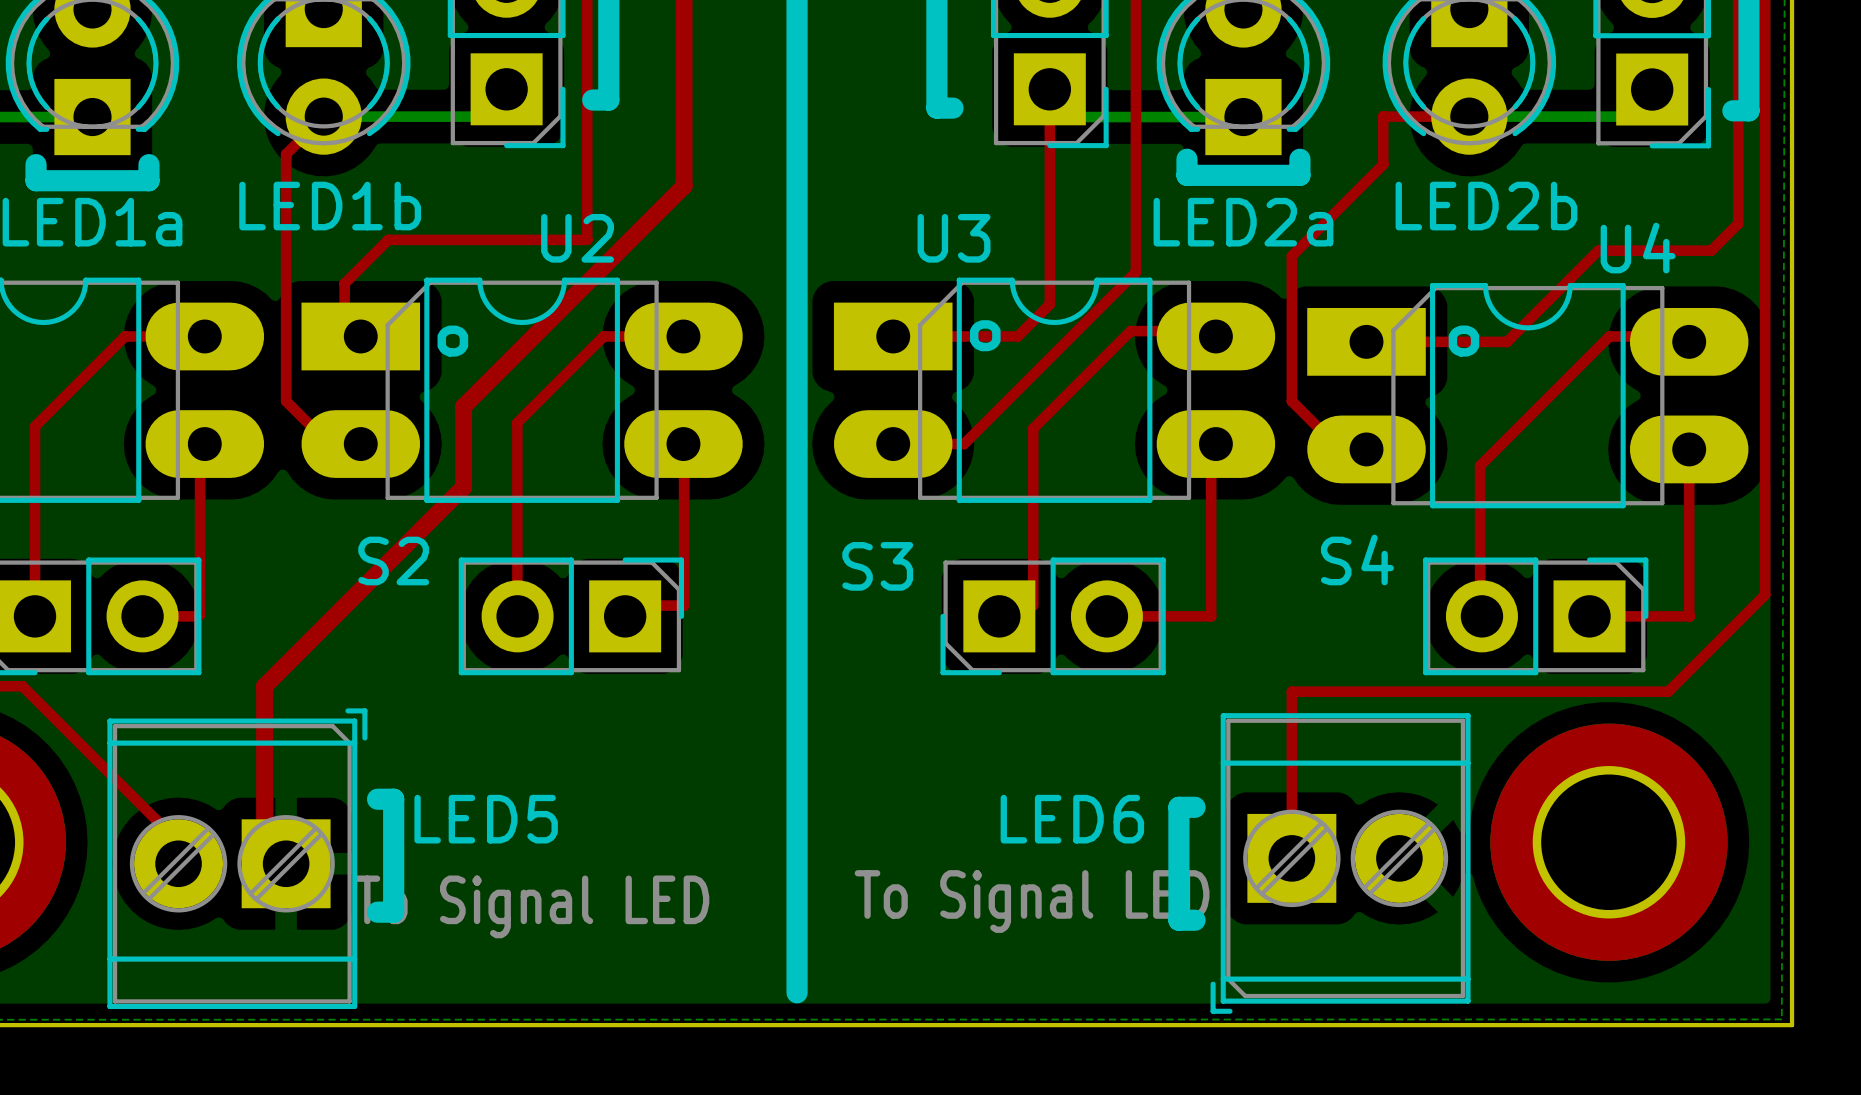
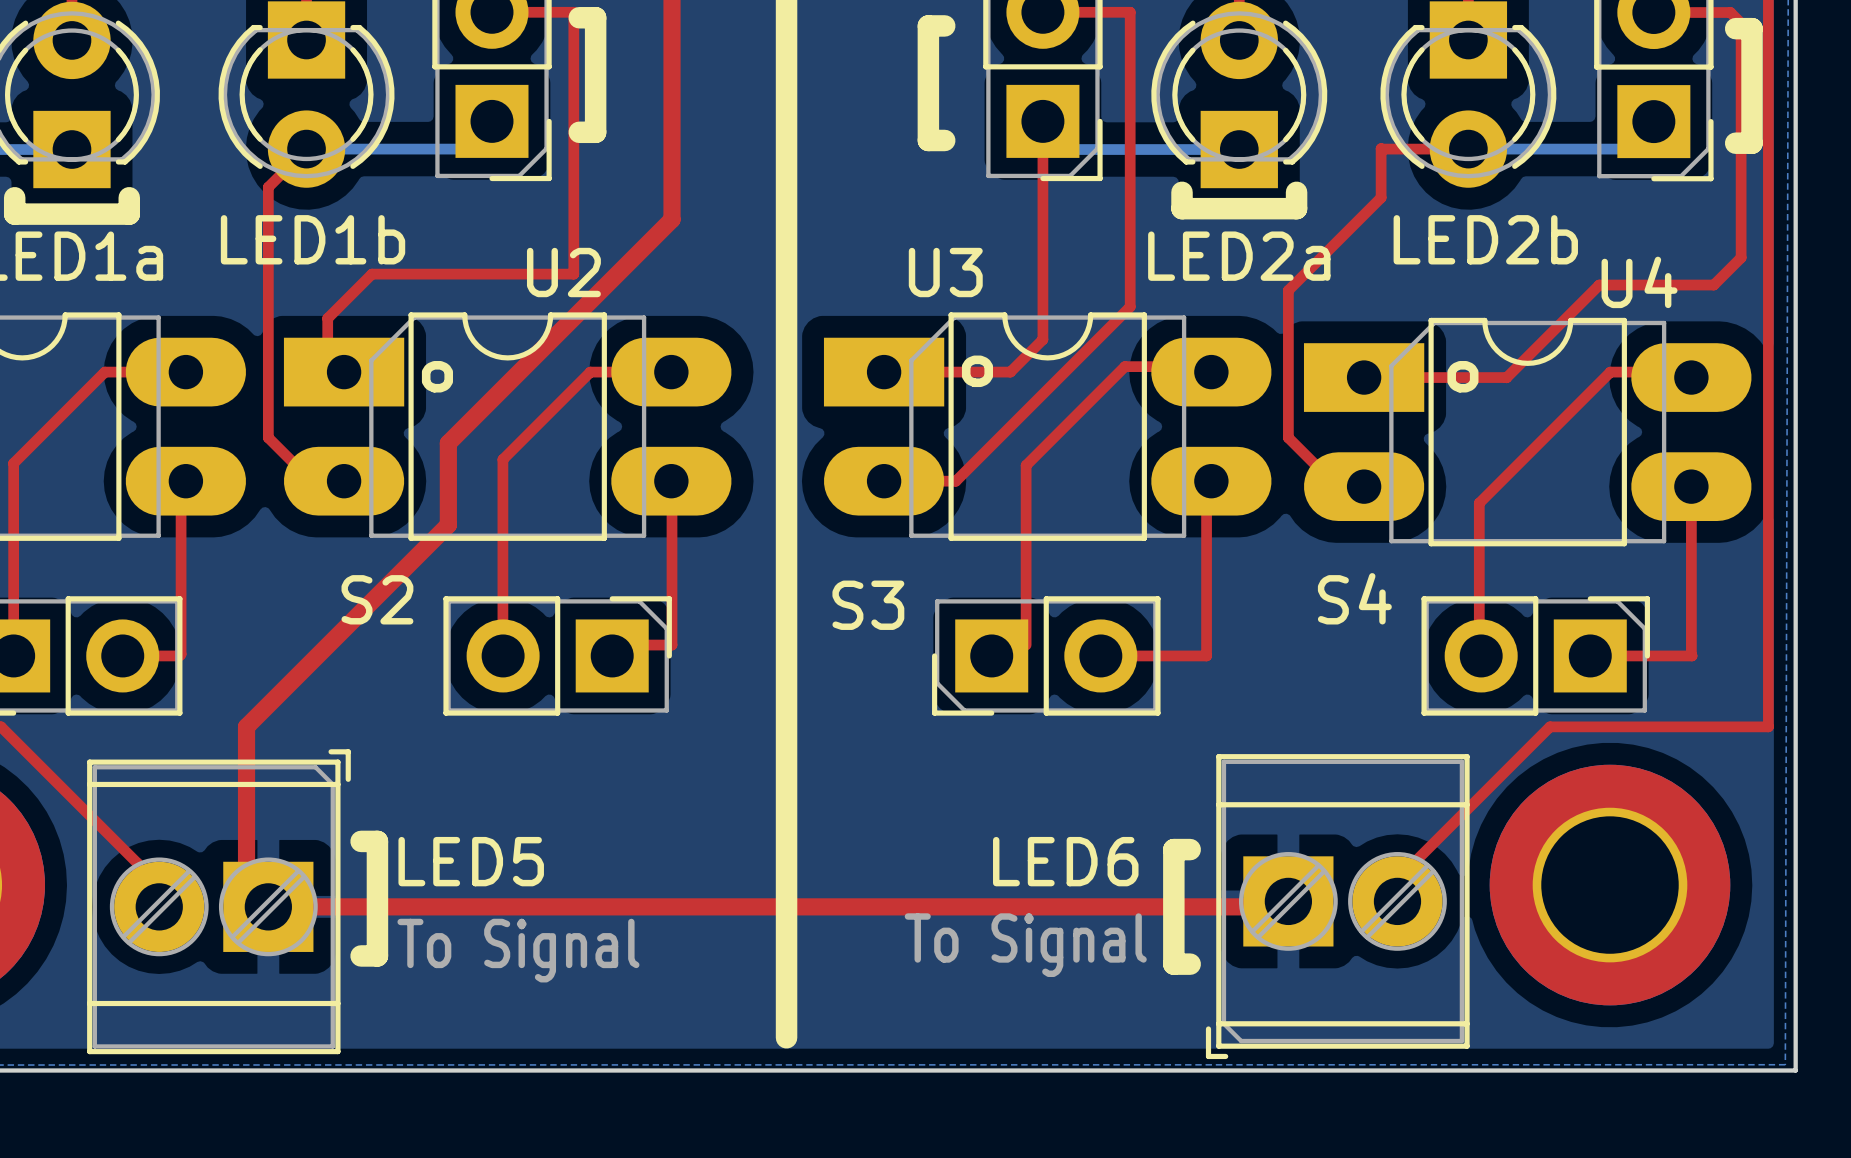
top track: (1765, 594) (1668, 691) (1291, 691) (1291, 858) -> (1768, 634) (1768, 726) (1550, 726) (1375, 901)
top track: none -> (246, 906) (1266, 906)
LED6 value: To Signal LED (1032, 901) -> To Signal (1025, 945)
LED5 value: To Signal LED (531, 906) -> To Signal (518, 950)

